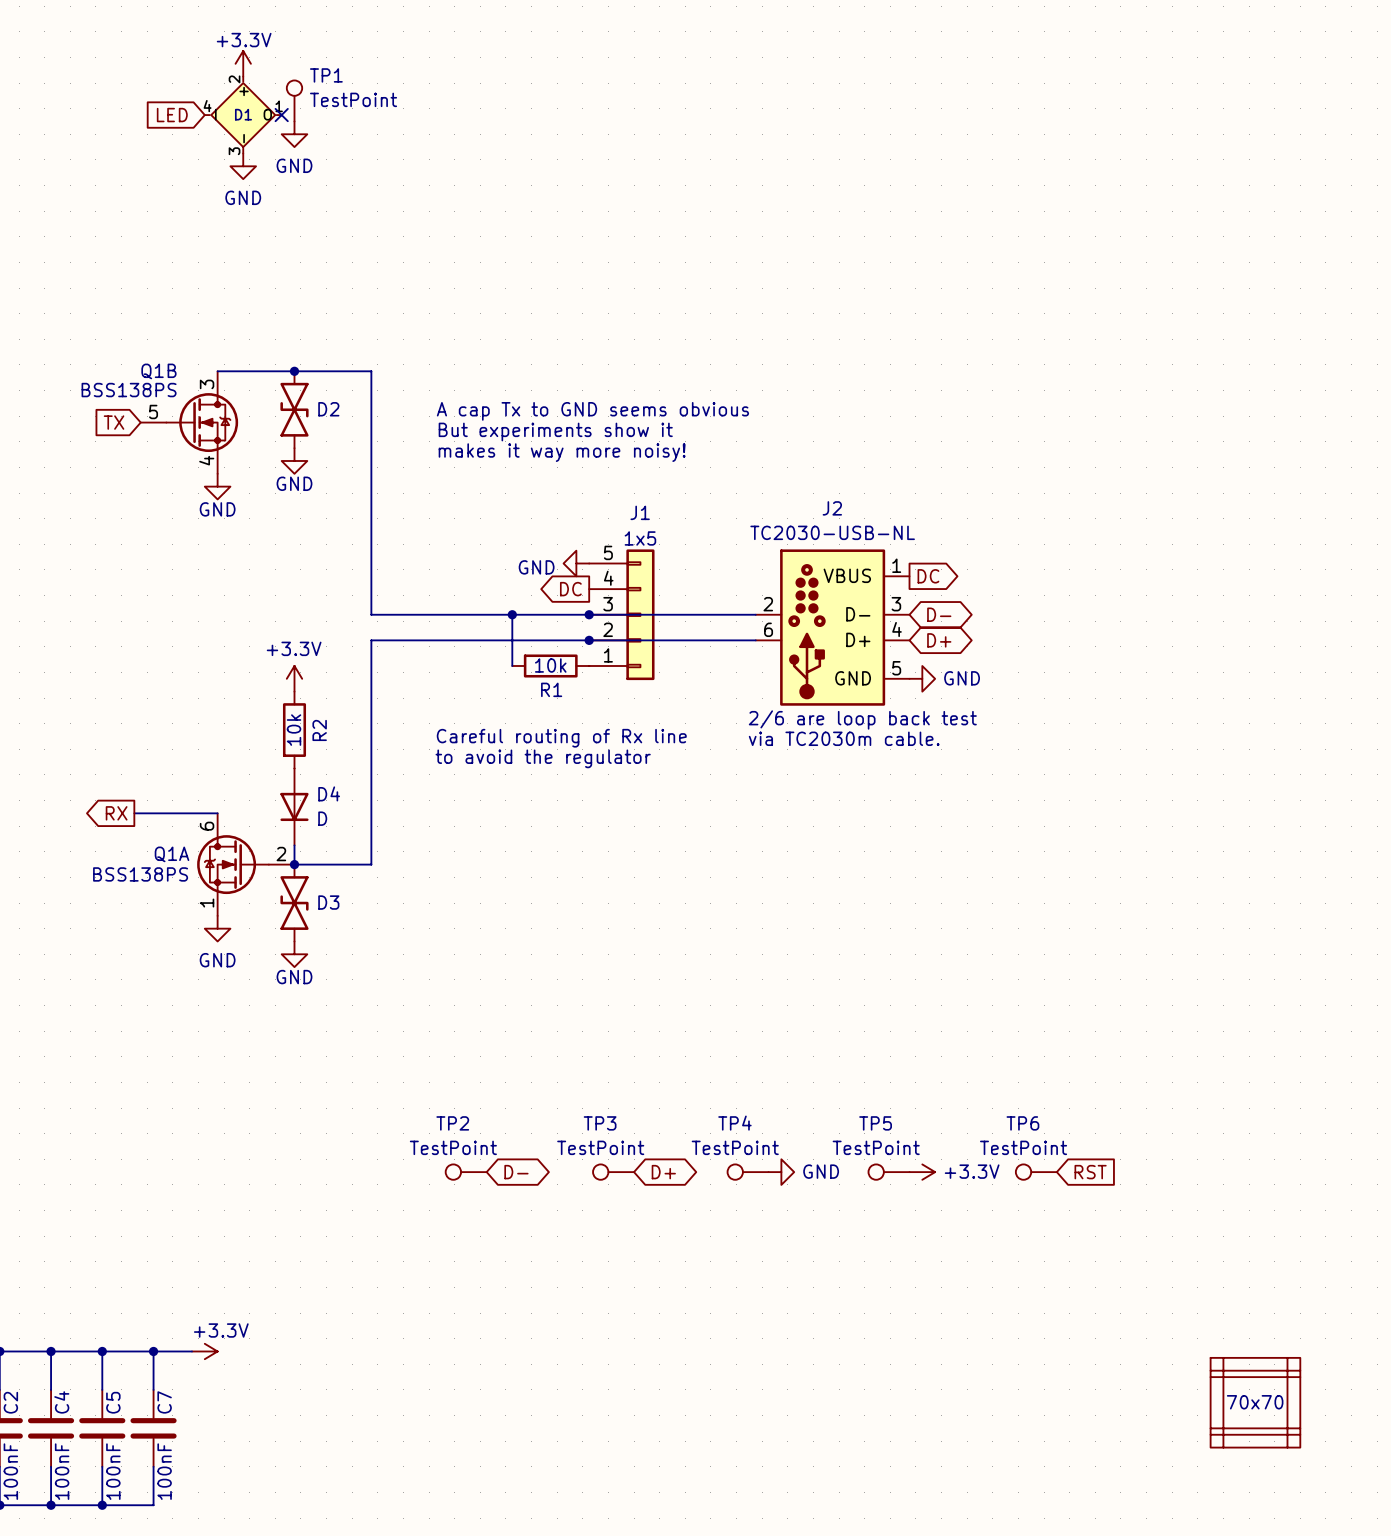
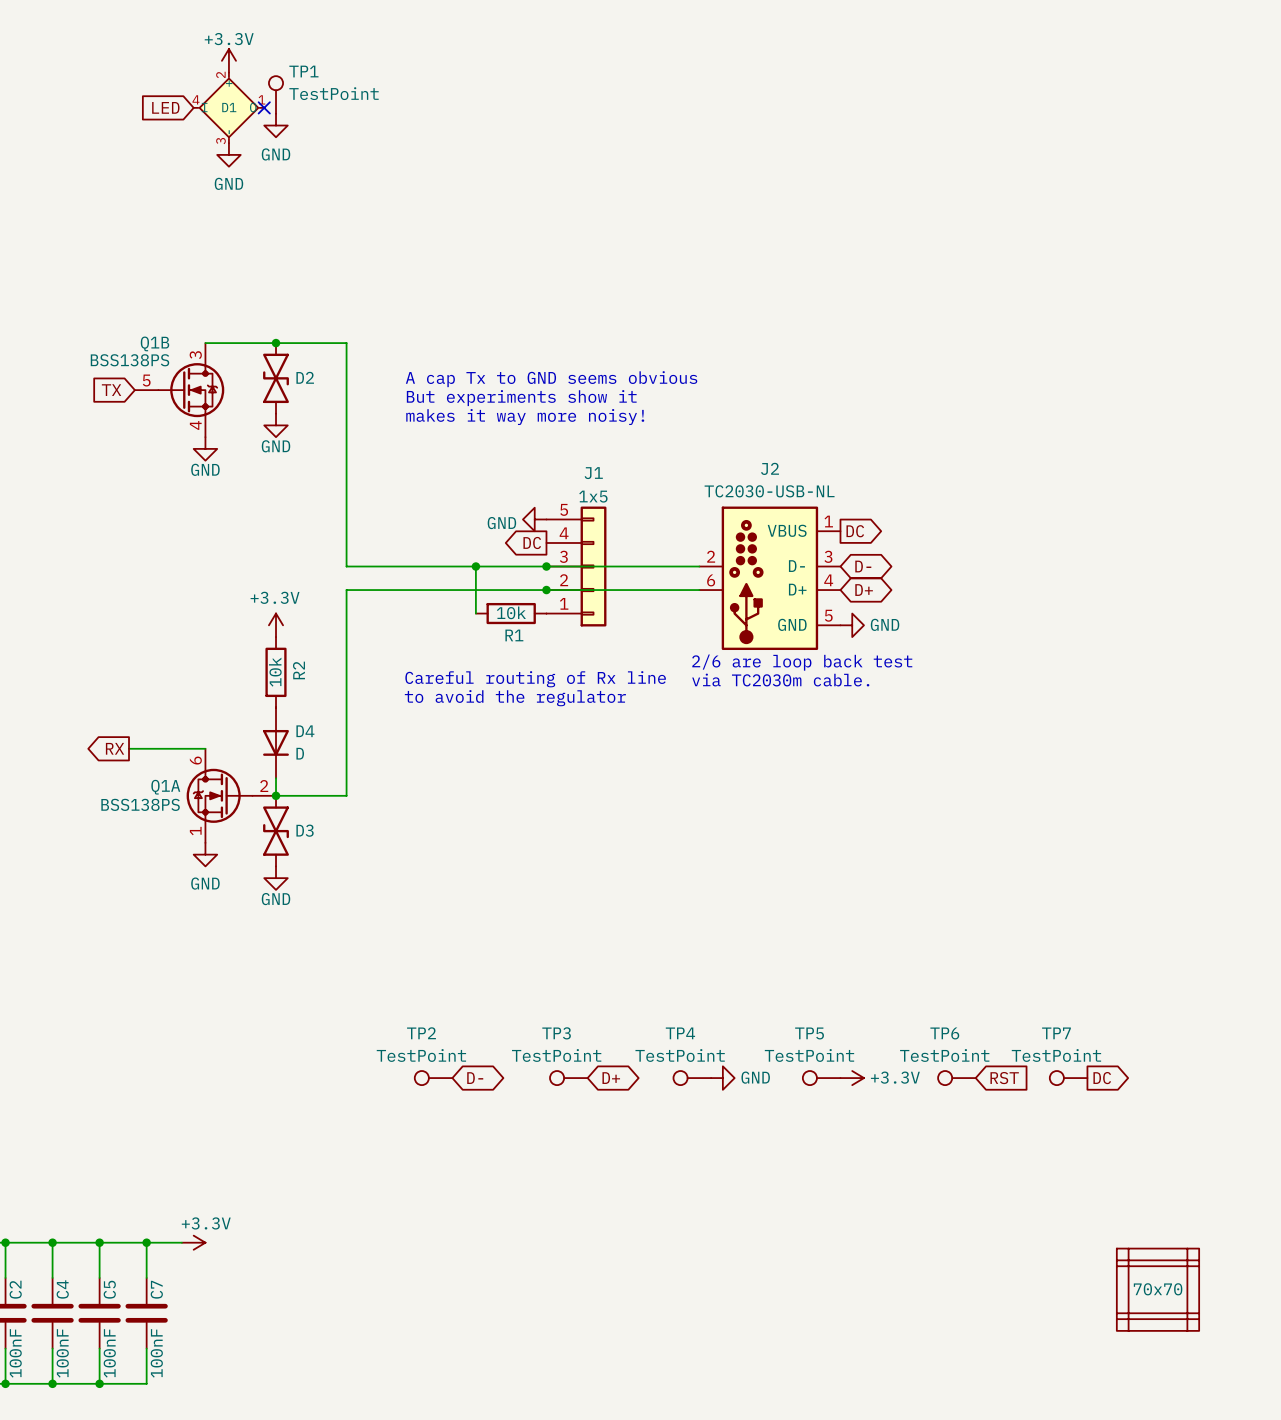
TP7: none -> TestPoint (1068, 1078)
global label: none -> DC (1102, 1078)

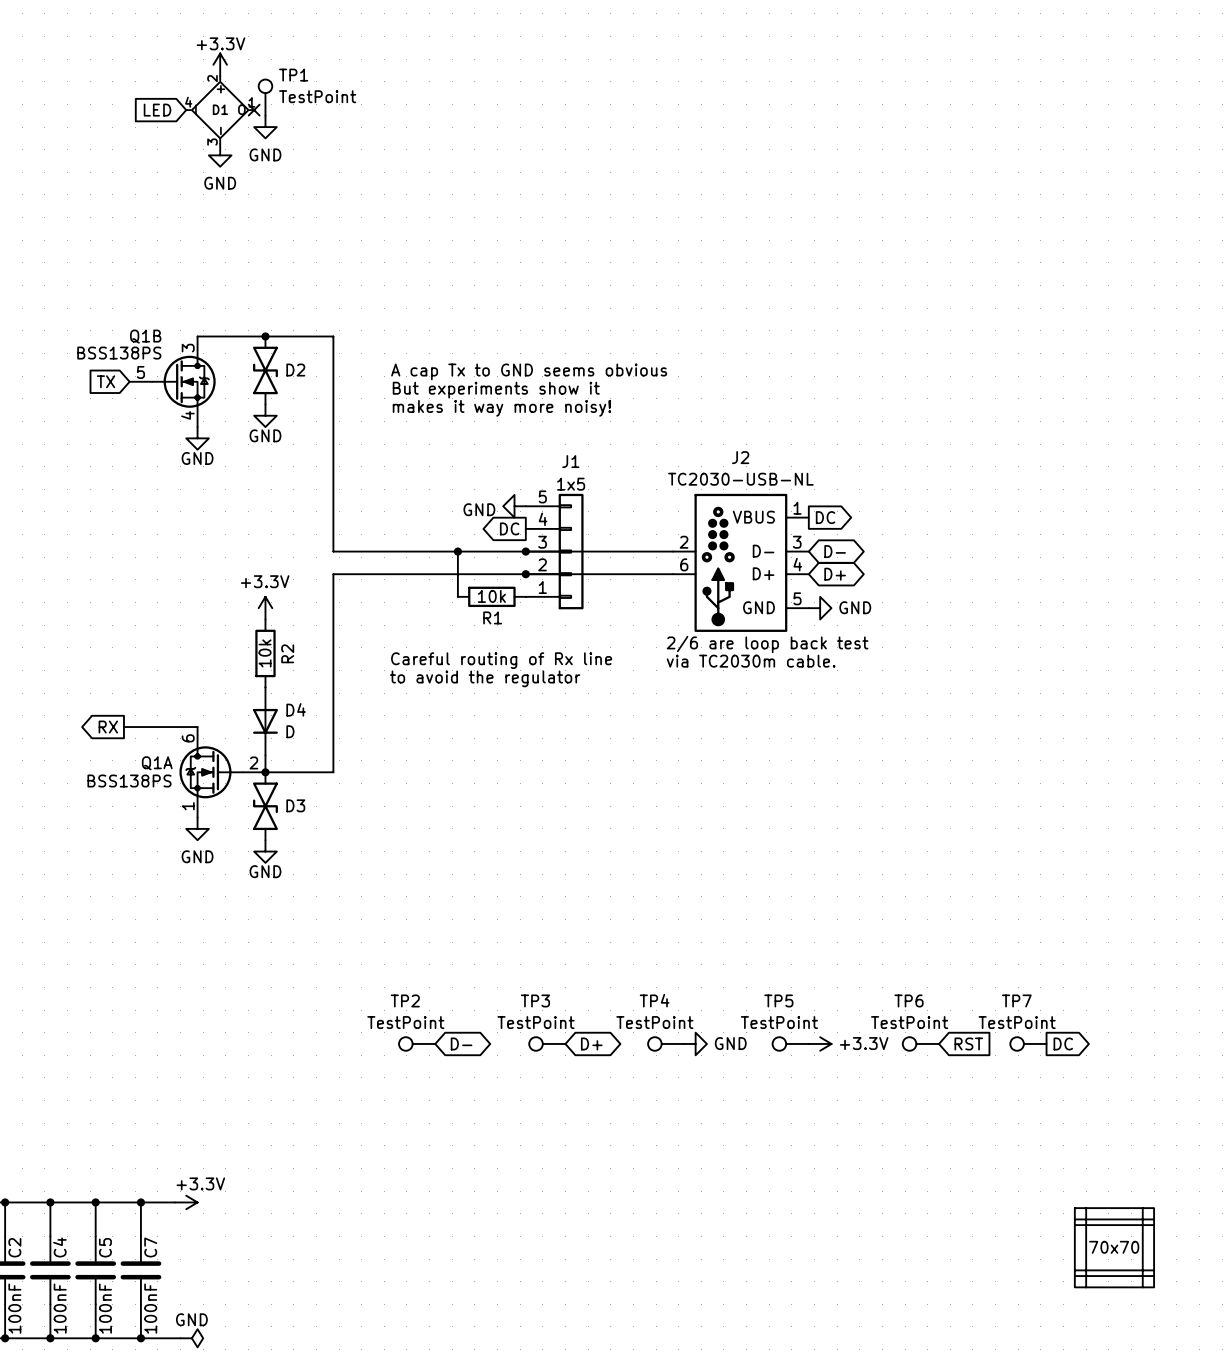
wire: none -> (140, 1338) (180, 1338)
junction: none -> (140, 1338)
power symbol: none -> GND (191, 1338)

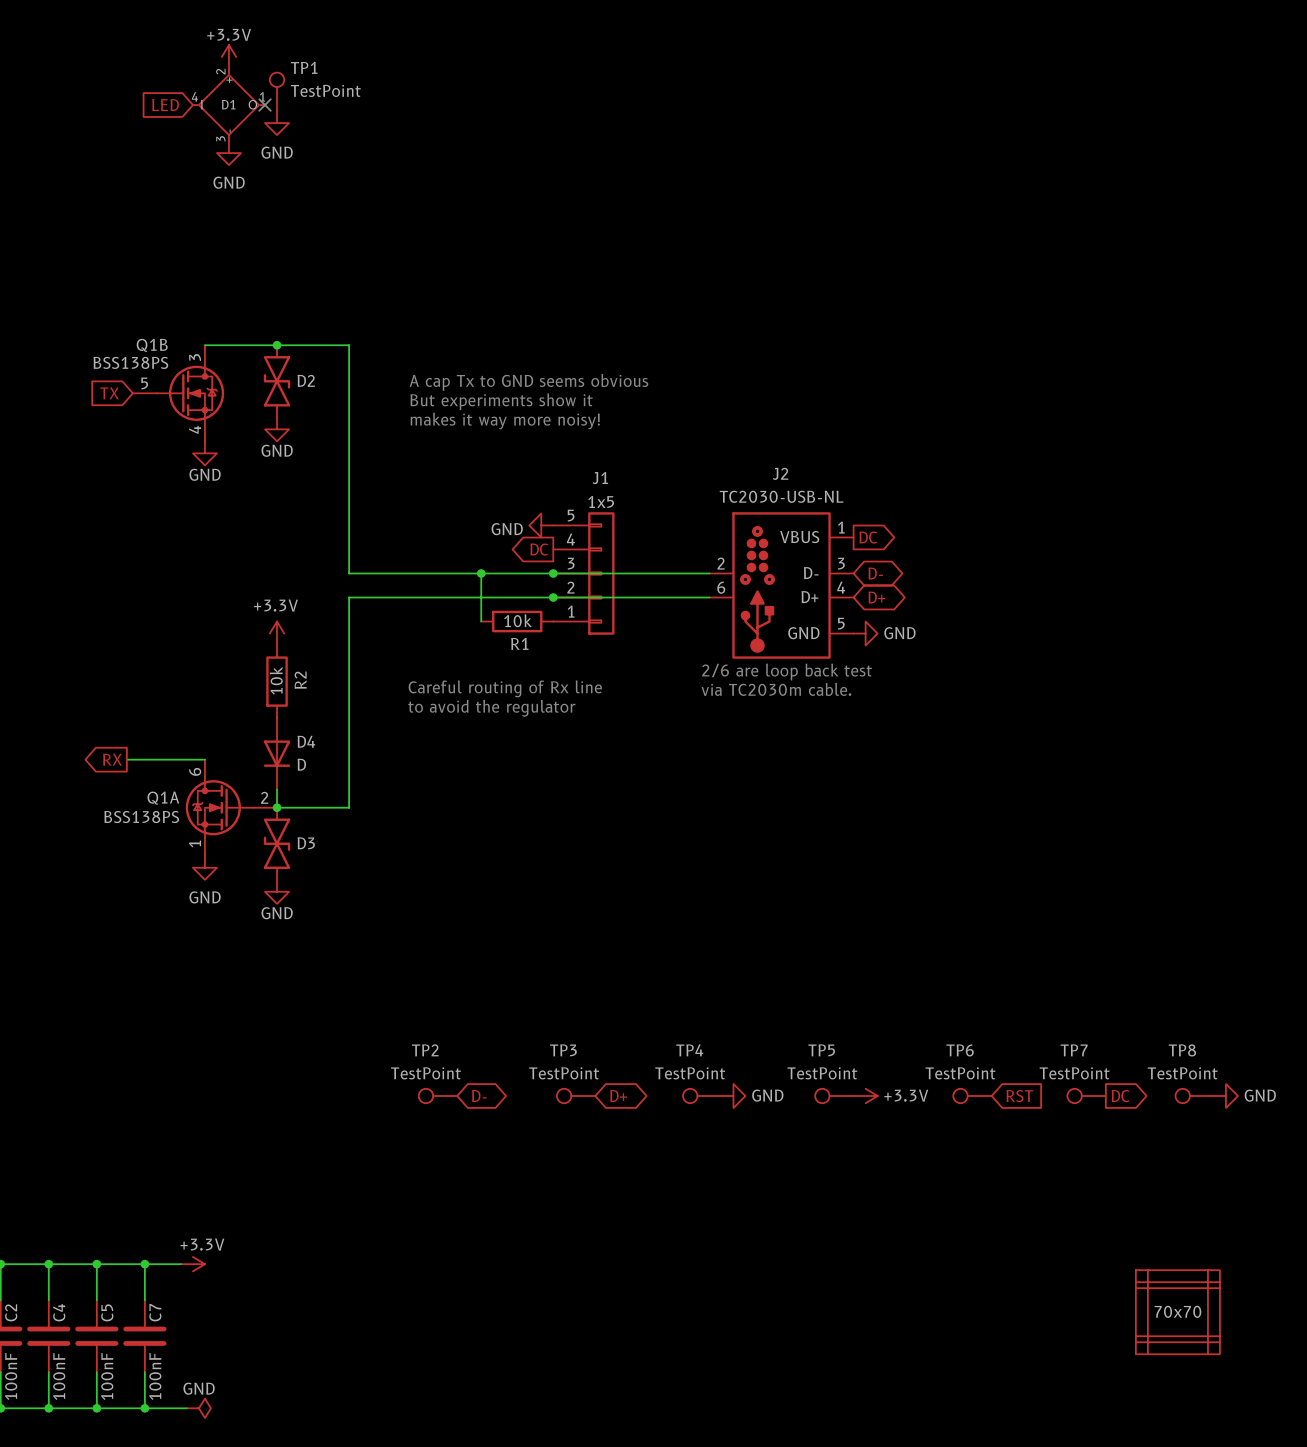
TP8: none -> TestPoint (1194, 1096)
power symbol: none -> GND (1225, 1096)

